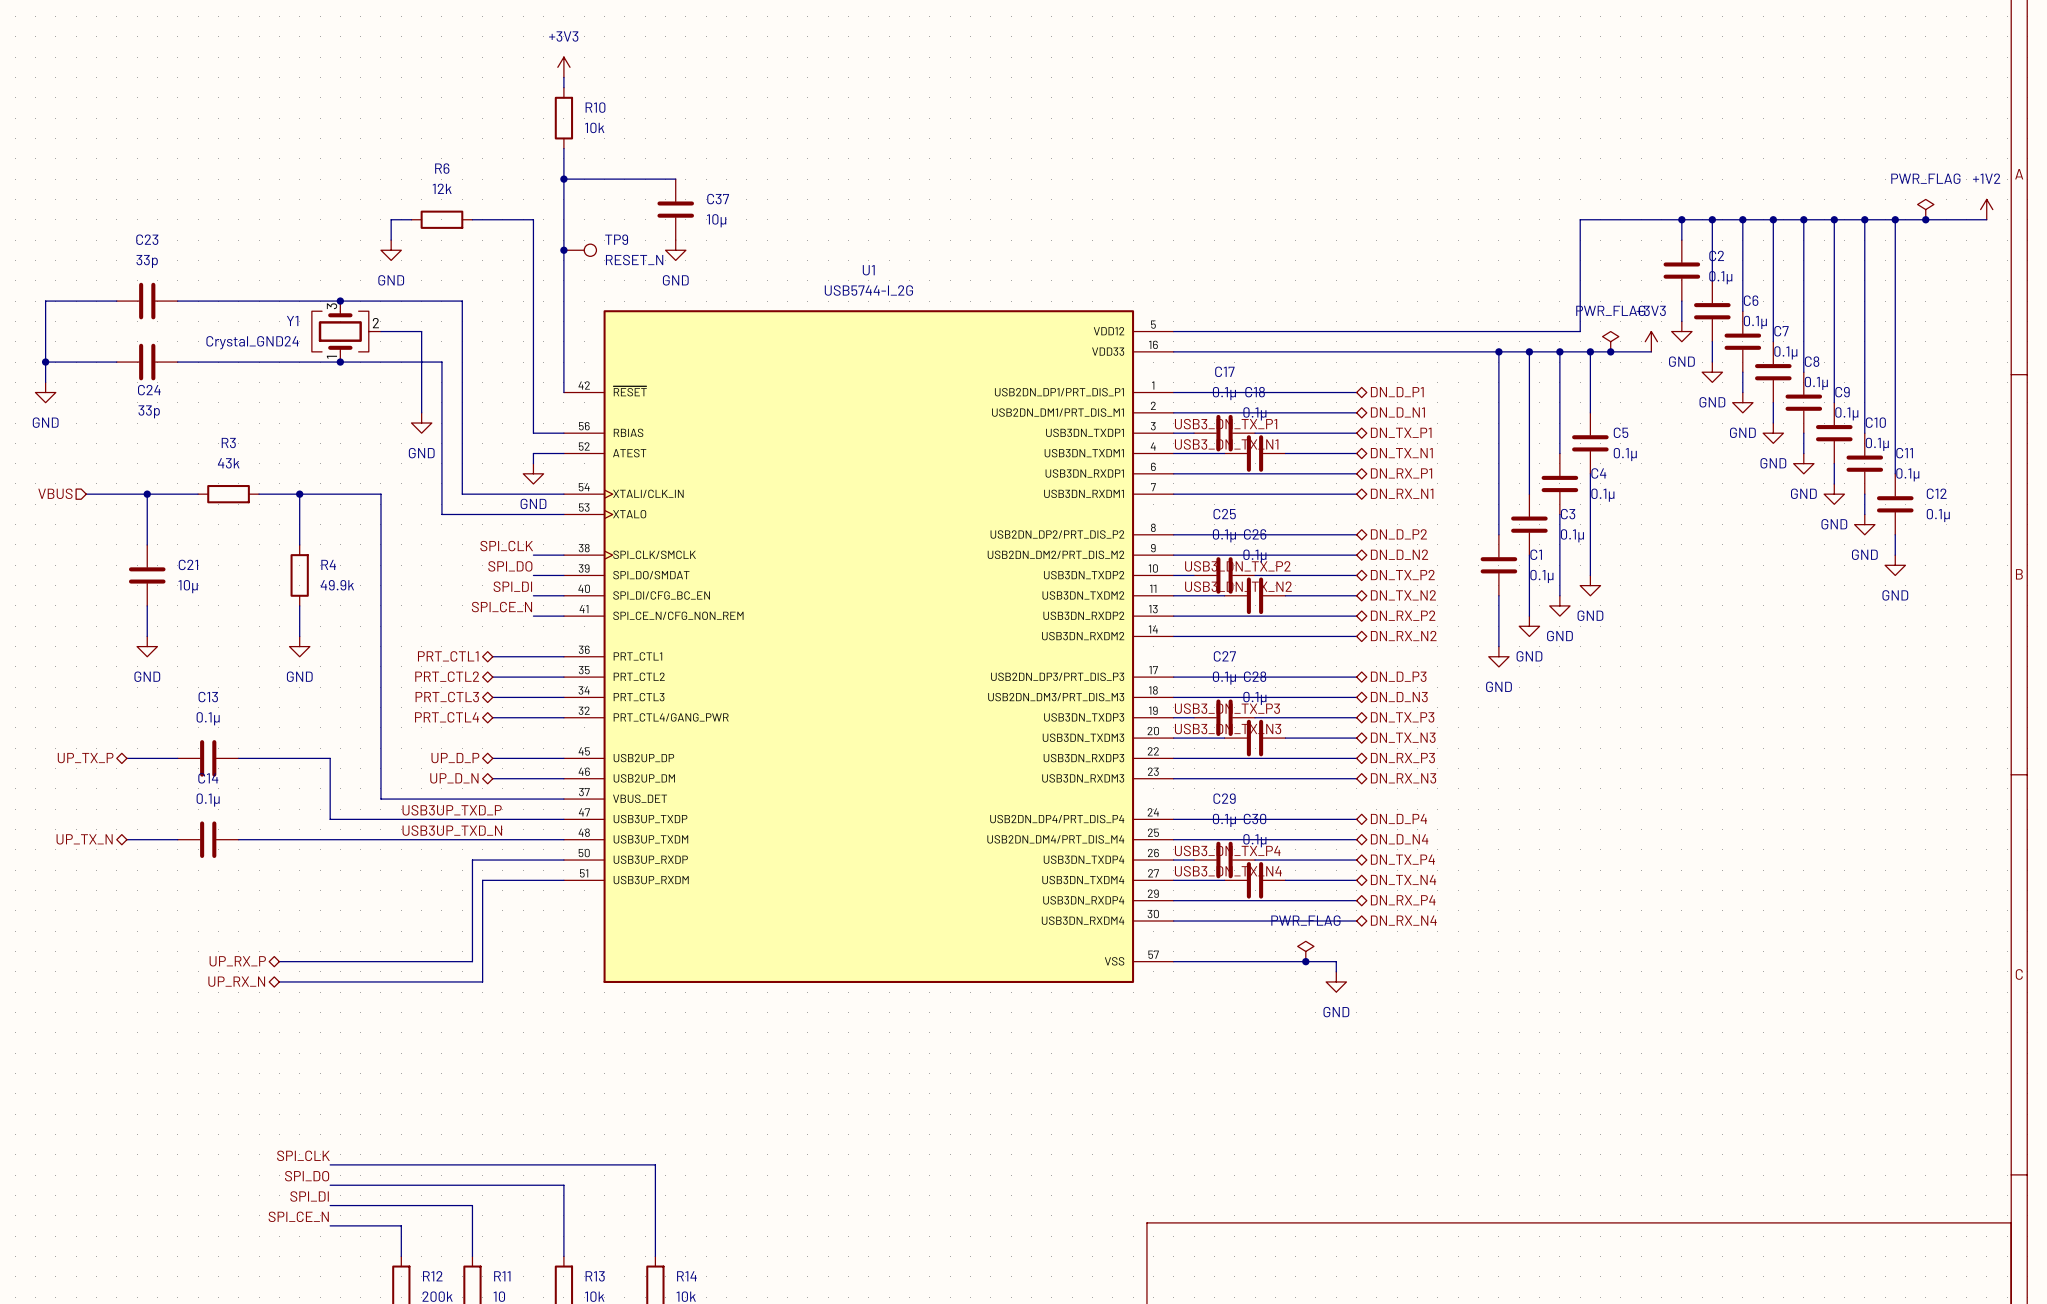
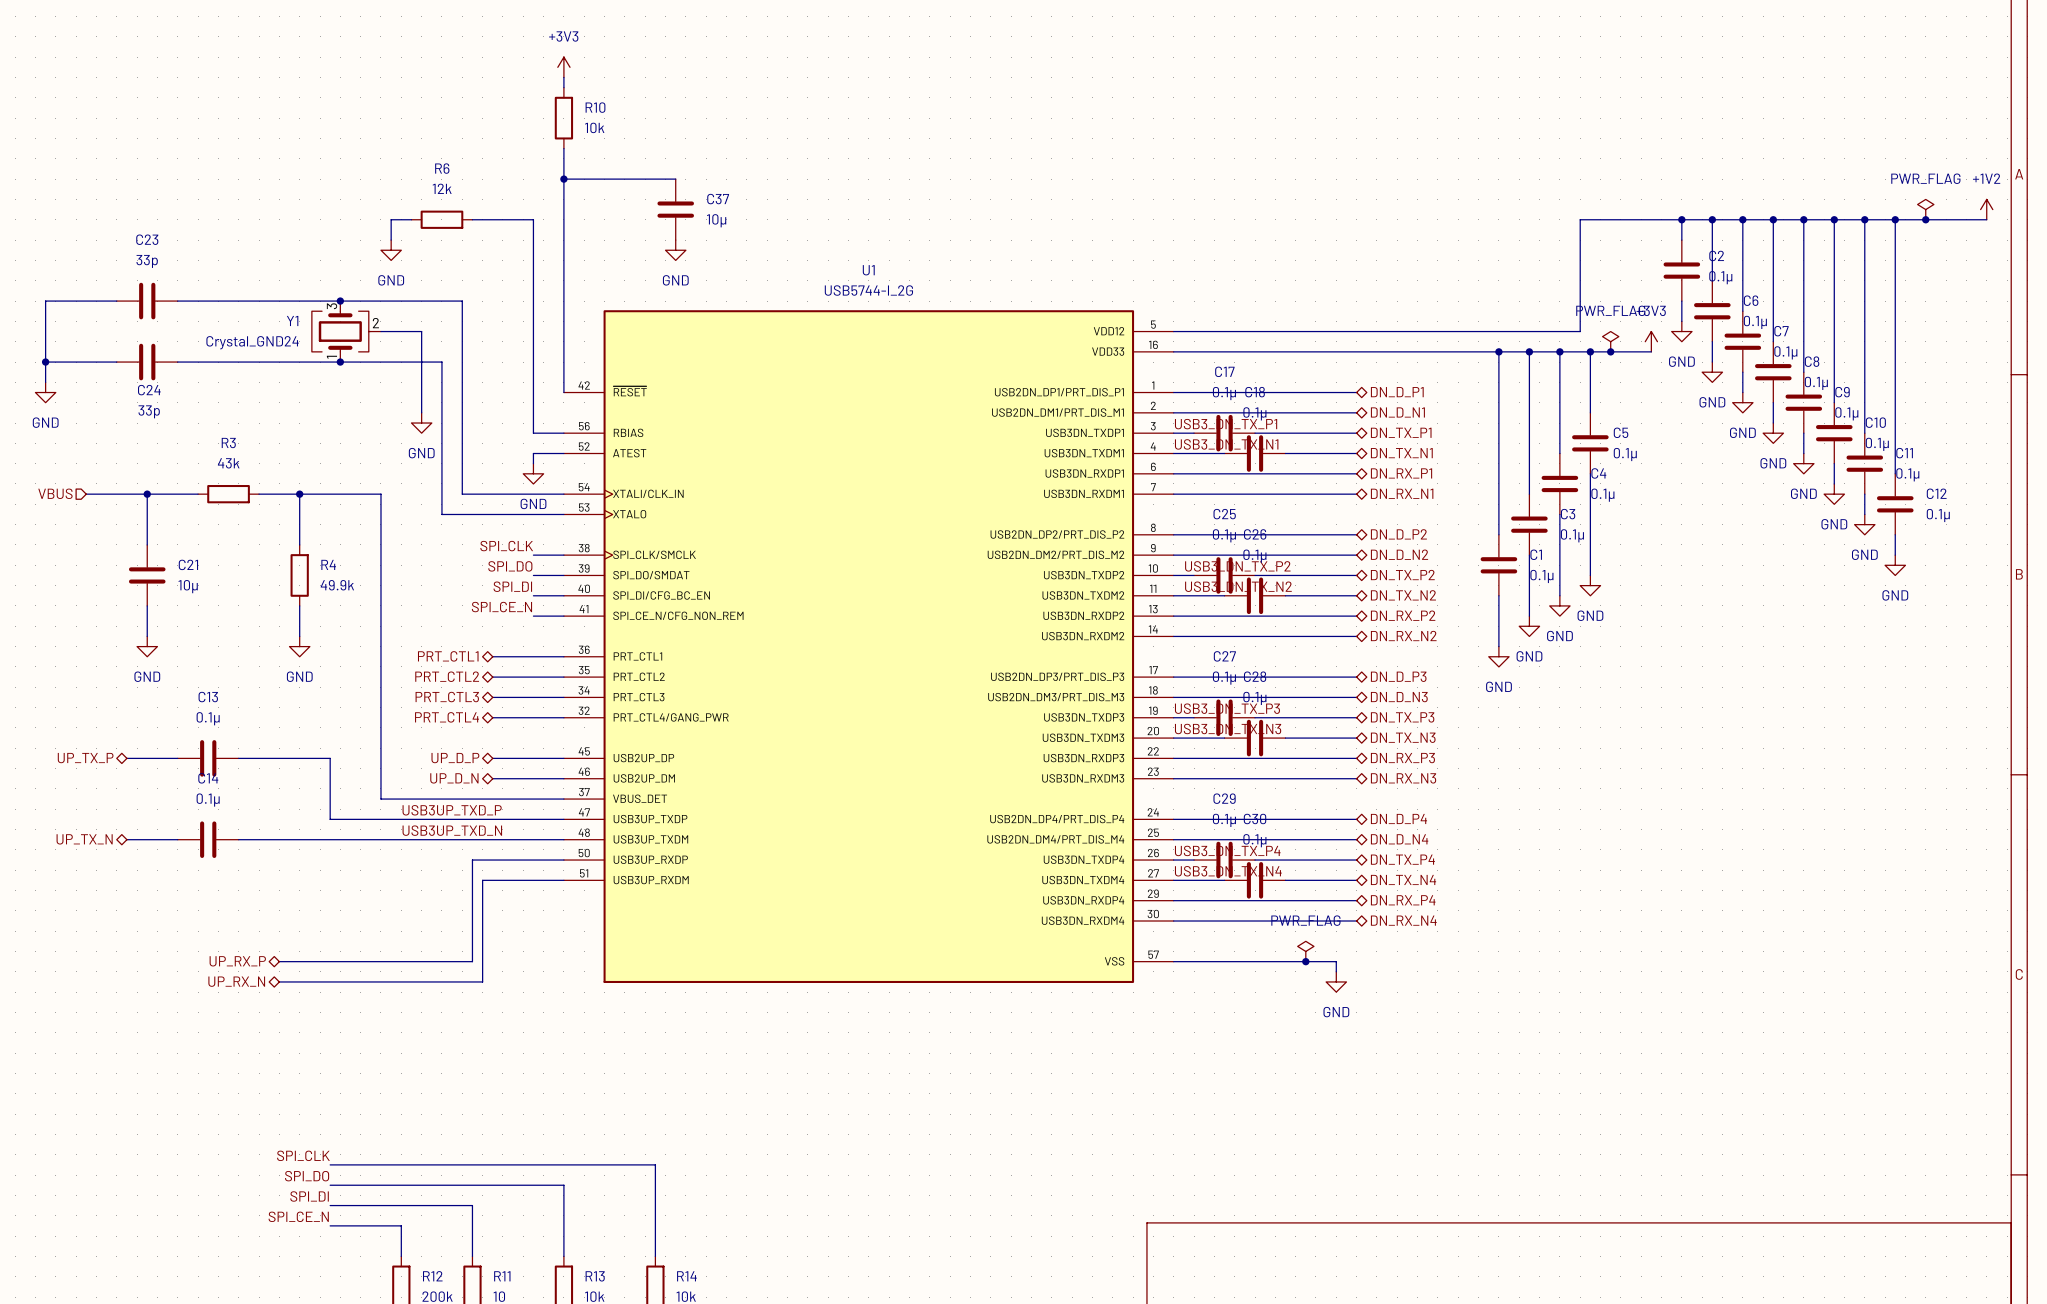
junction: (563, 250) -> none
TP9: RESET_N (580, 250) -> none

